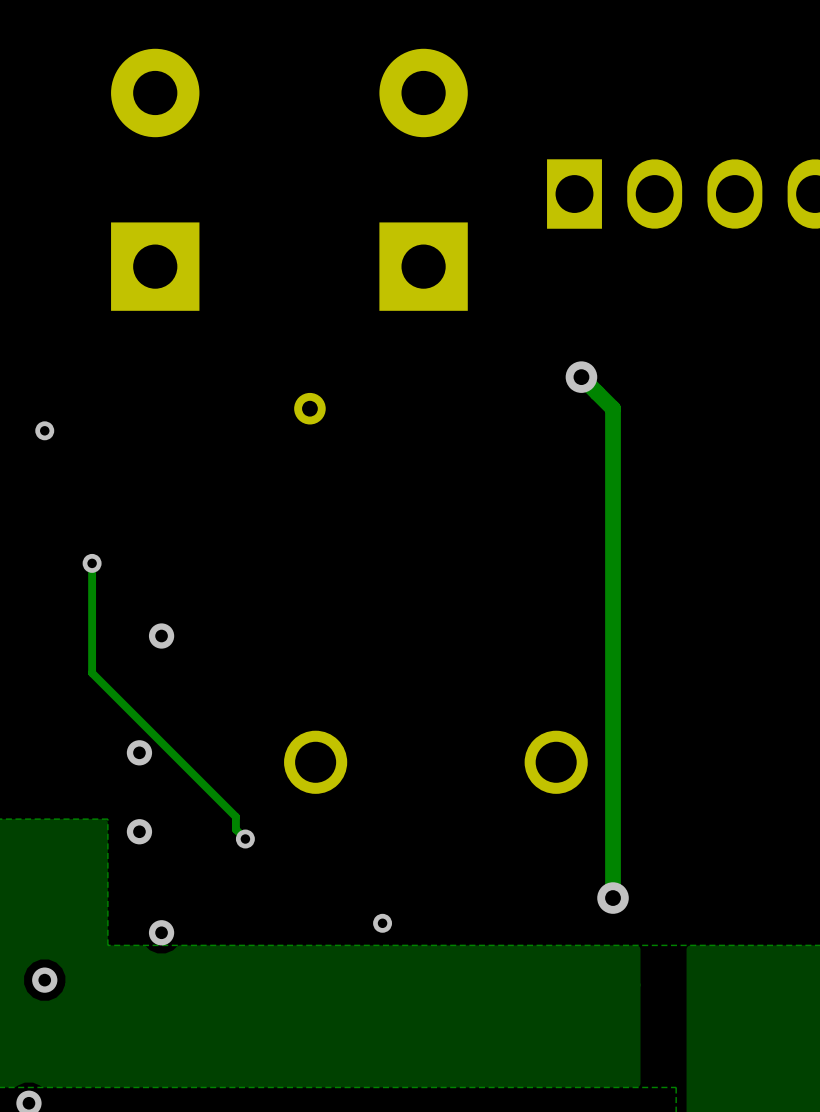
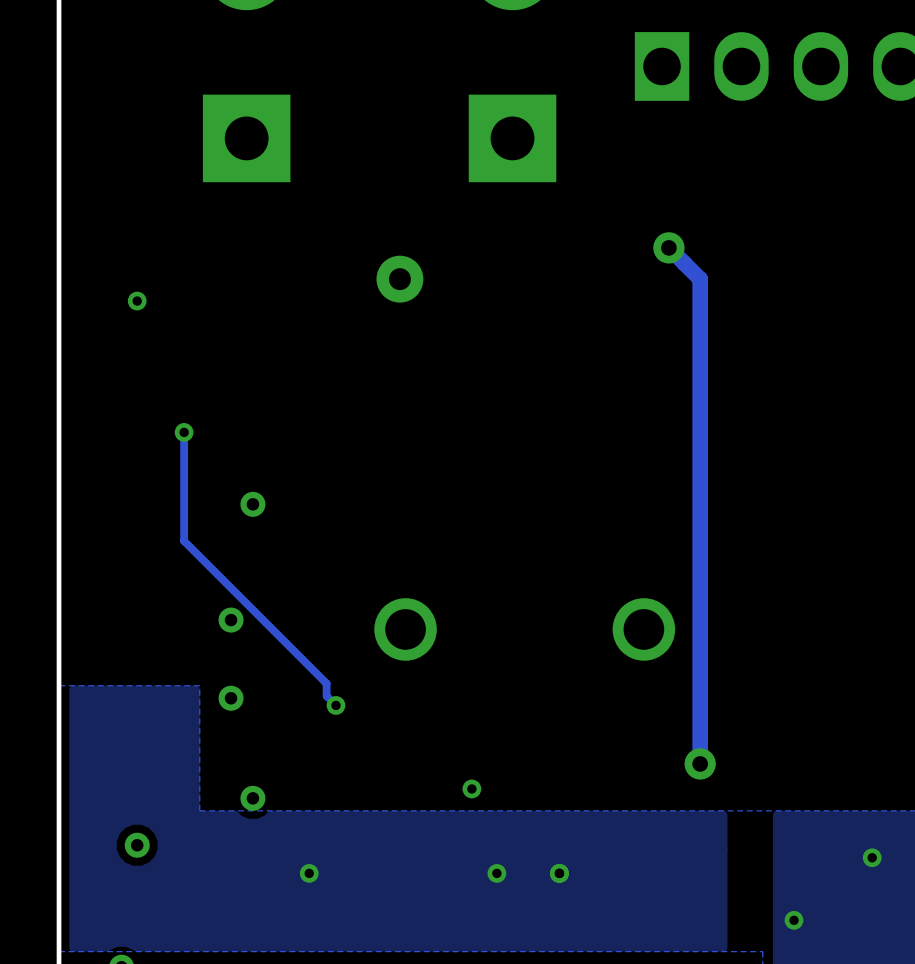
part footprint: [294, 392, 326, 425] -> [376, 255, 424, 303]
part: none -> (872, 857)
part: none -> (309, 873)
part: none -> (496, 873)
part: none -> (559, 873)
part: none -> (794, 920)

